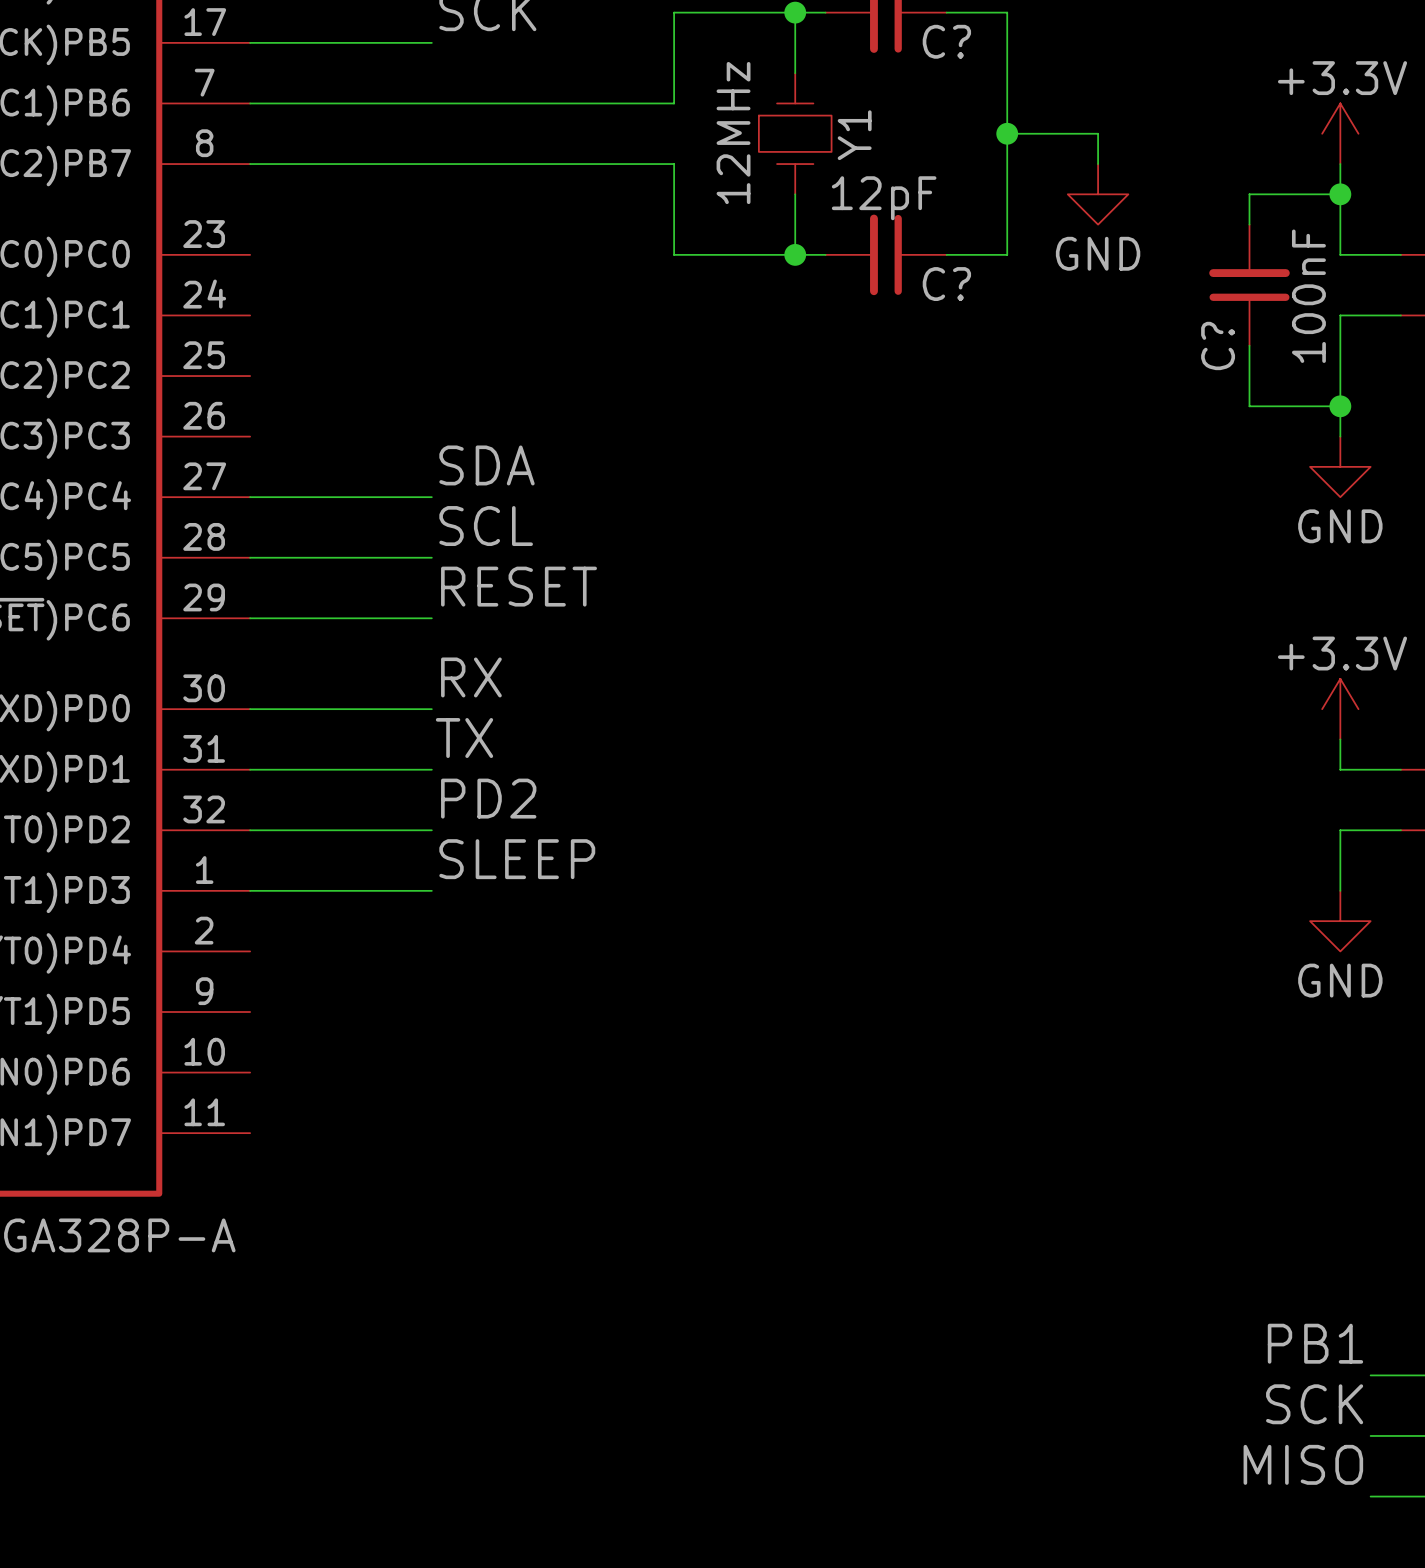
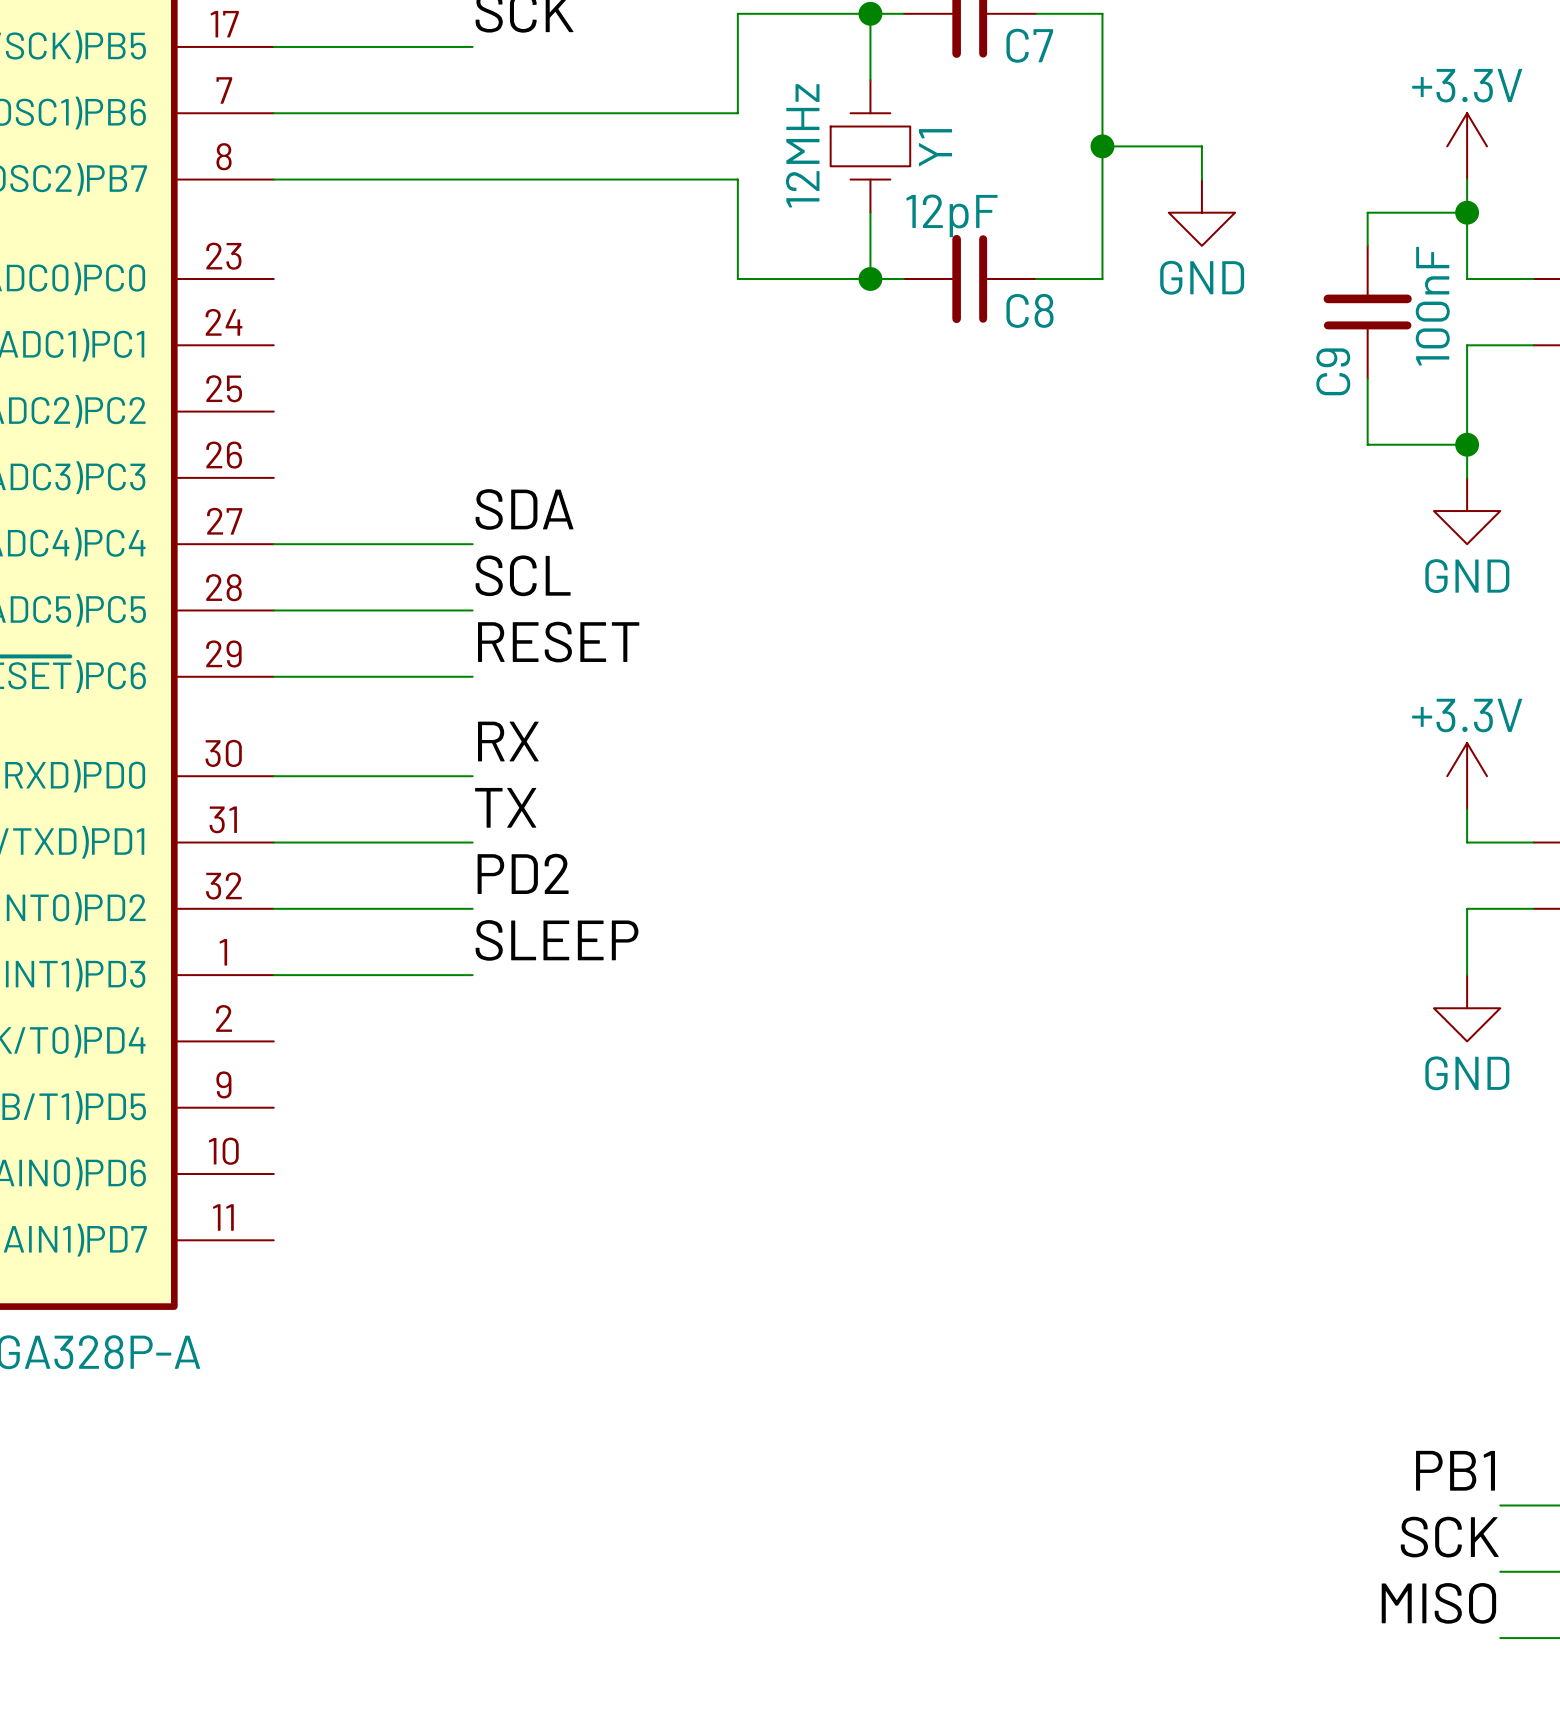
C? name: C? (946, 41) -> C7 (1029, 45)
C? name: C? (946, 284) -> C8 (1030, 310)
C? name: C? (1218, 345) -> C9 (1333, 371)

